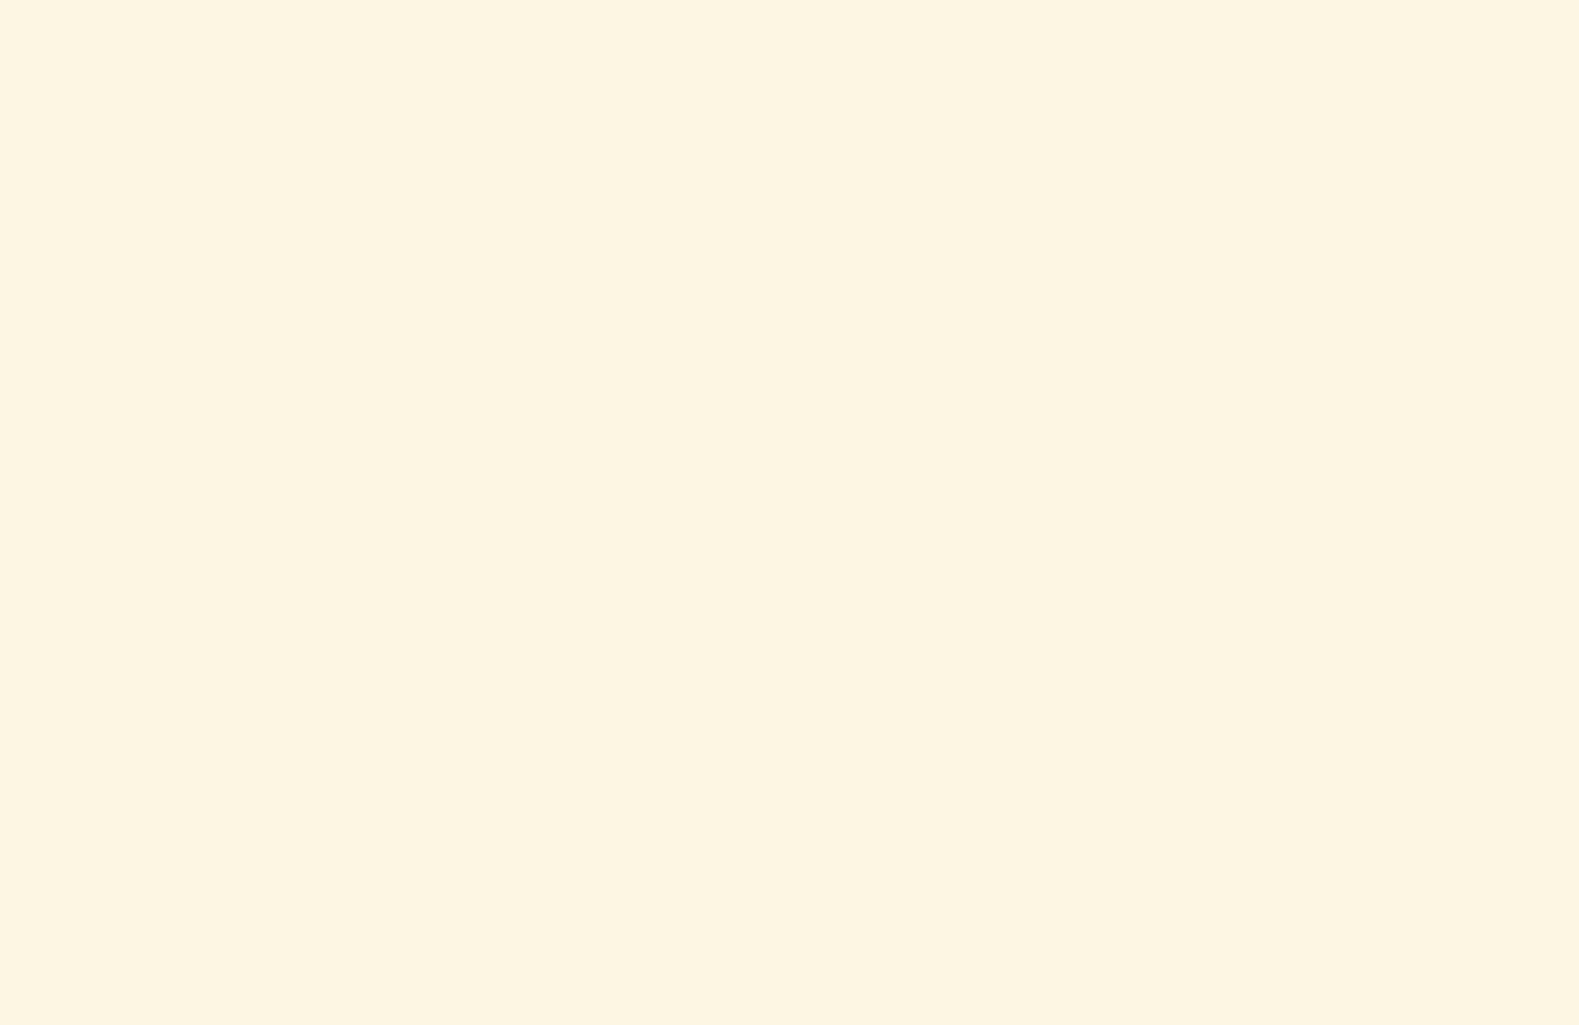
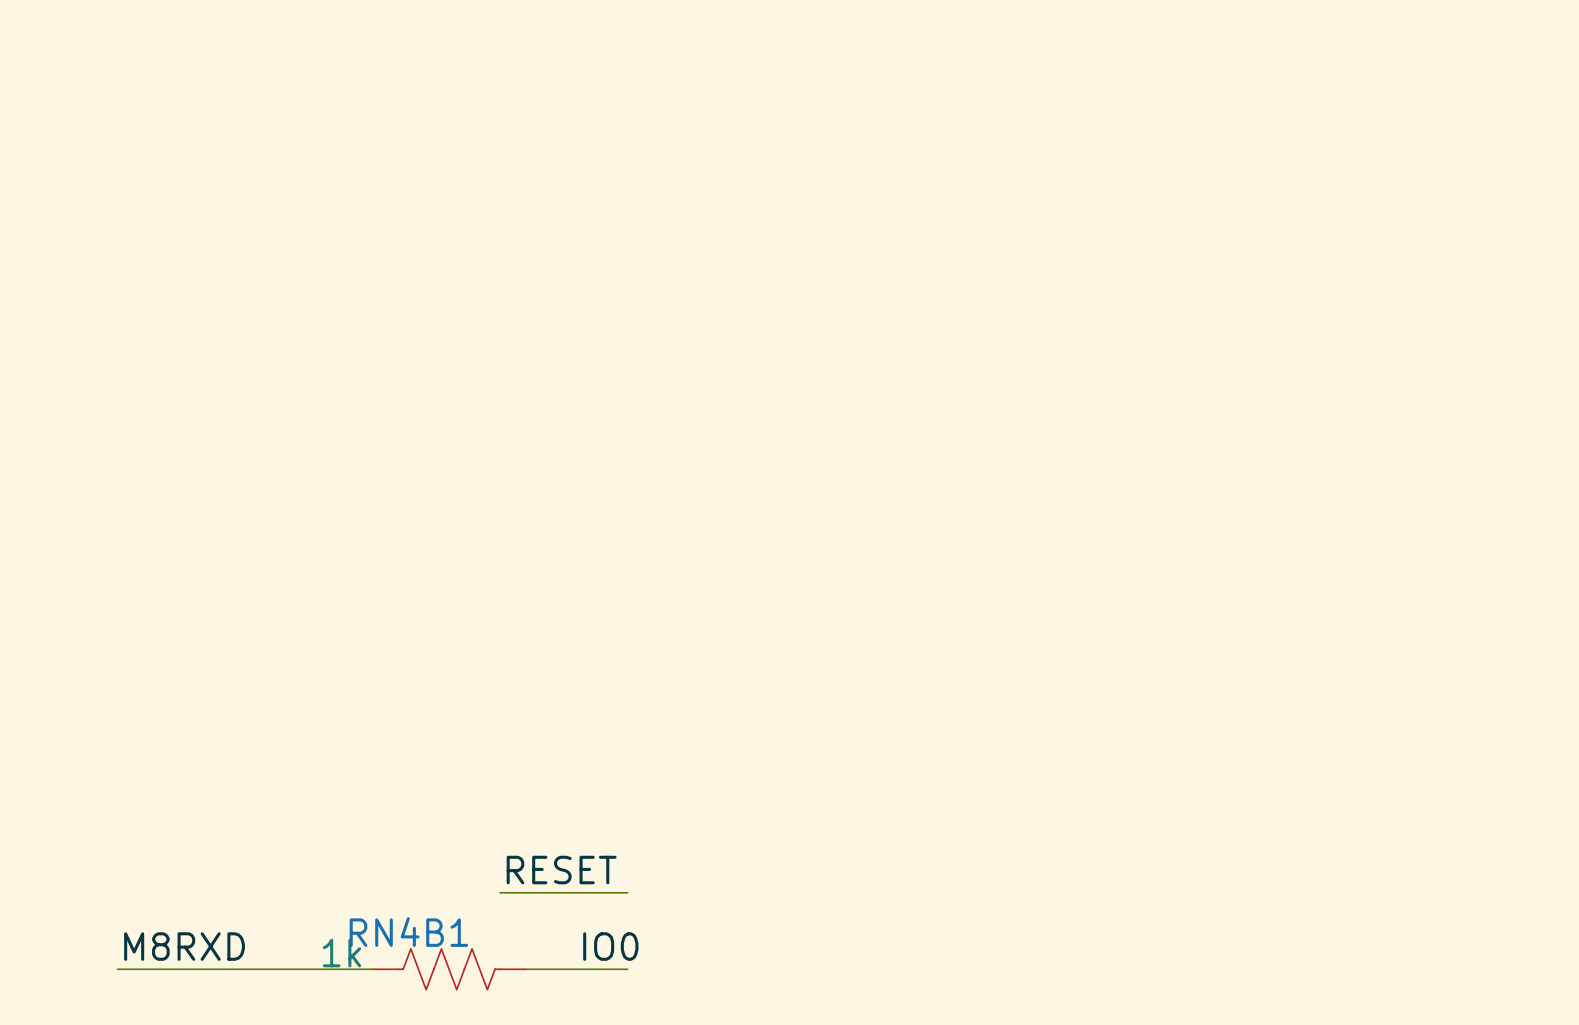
label: none -> RESET (561, 870)
wire: none -> (500, 892) (627, 892)
label: none -> M8RXD (184, 946)
label: none -> IO0 (610, 946)
wire: none -> (117, 969) (372, 969)
RN4B1: none -> 1k (449, 969)
wire: none -> (525, 969) (627, 969)

